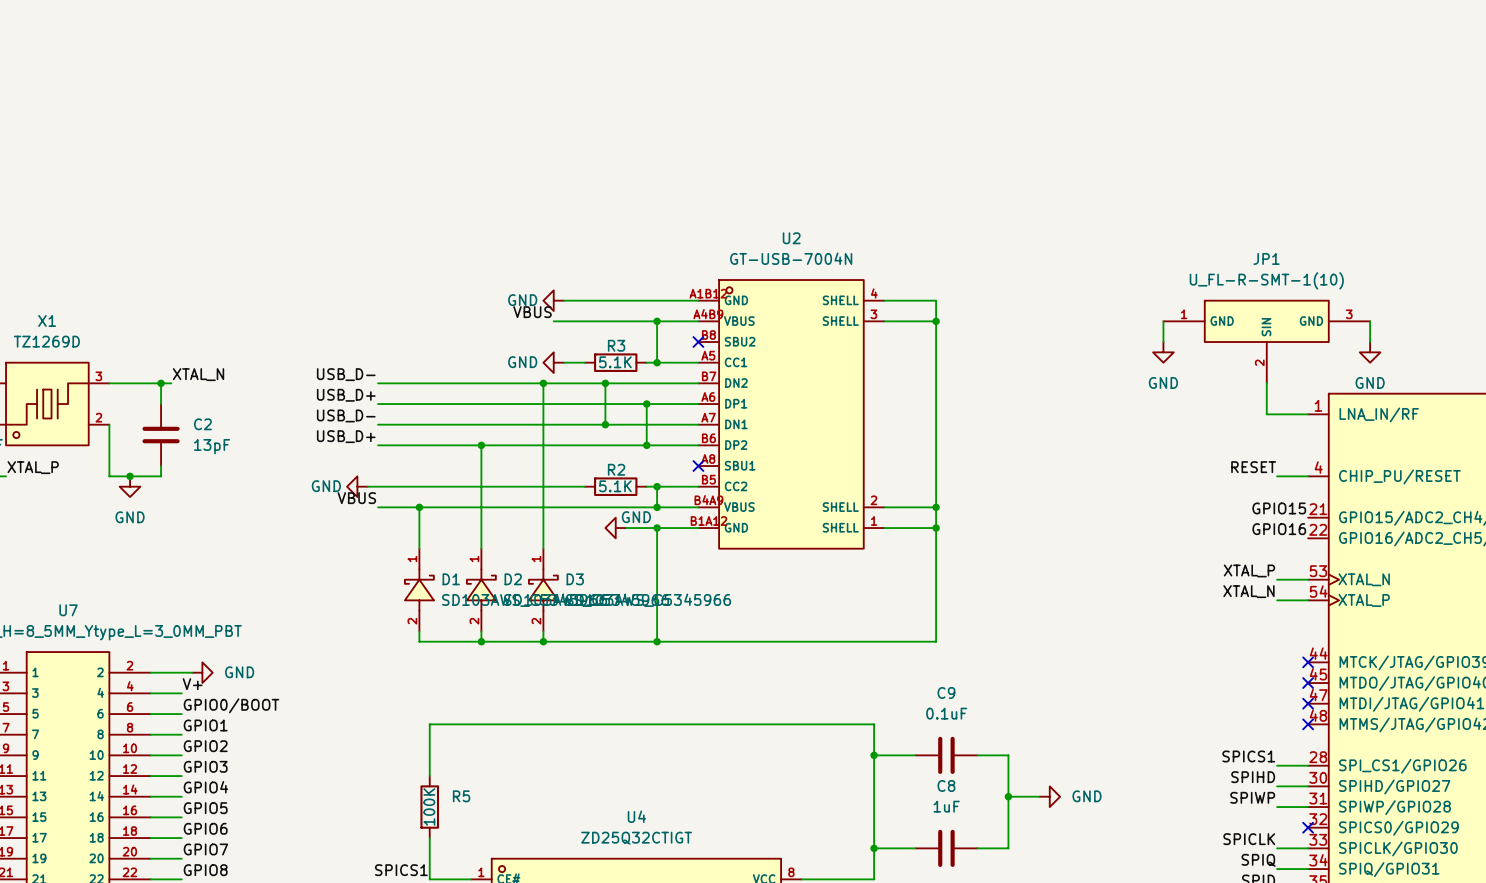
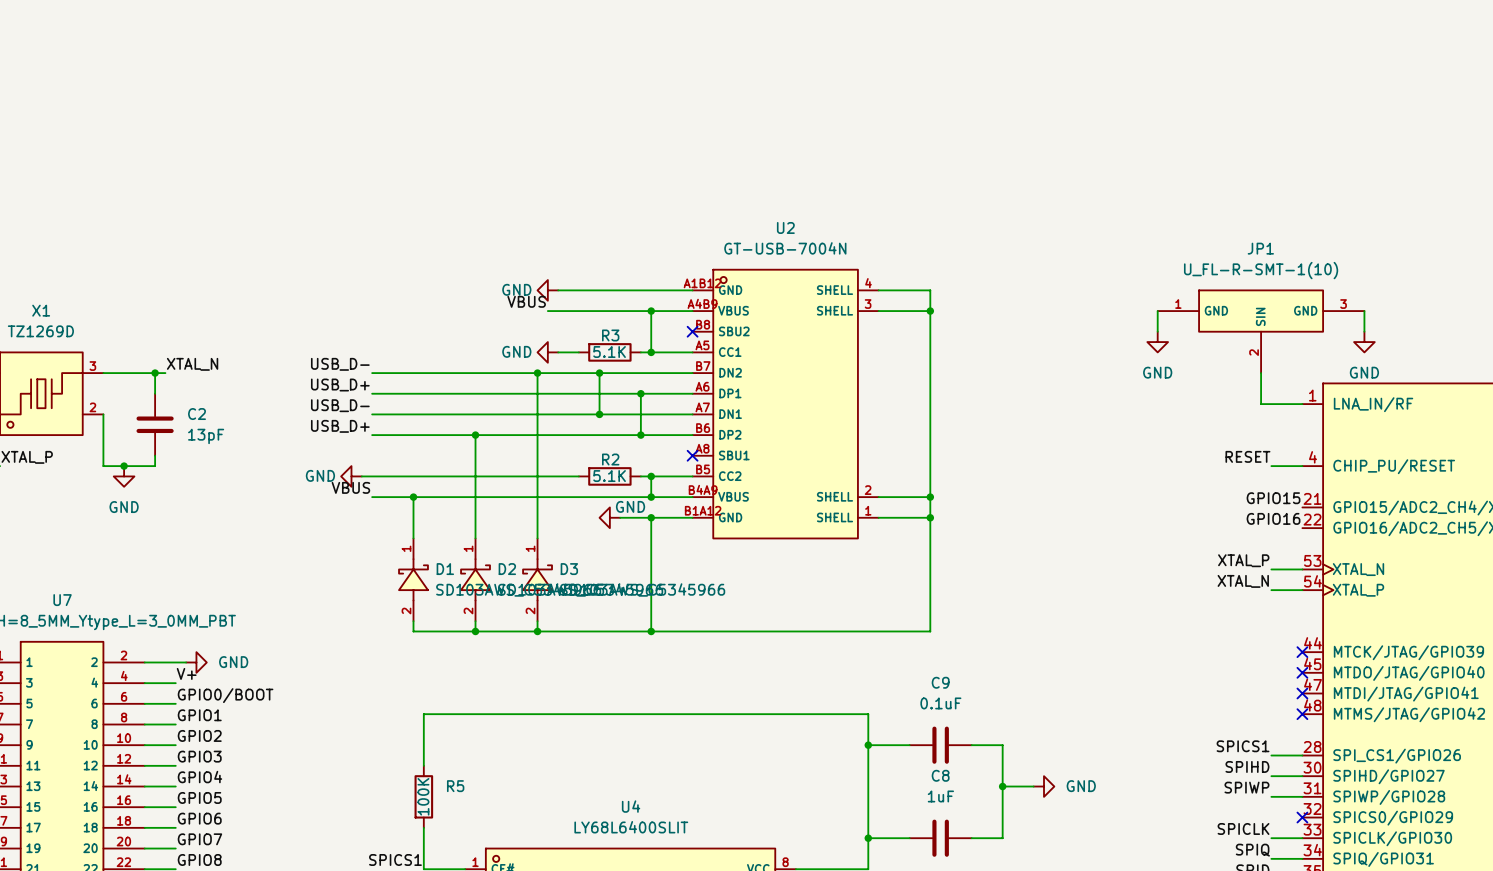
U4 value: ZD25Q32CTIGT (636, 838) -> LY68L6400SLIT (631, 827)

